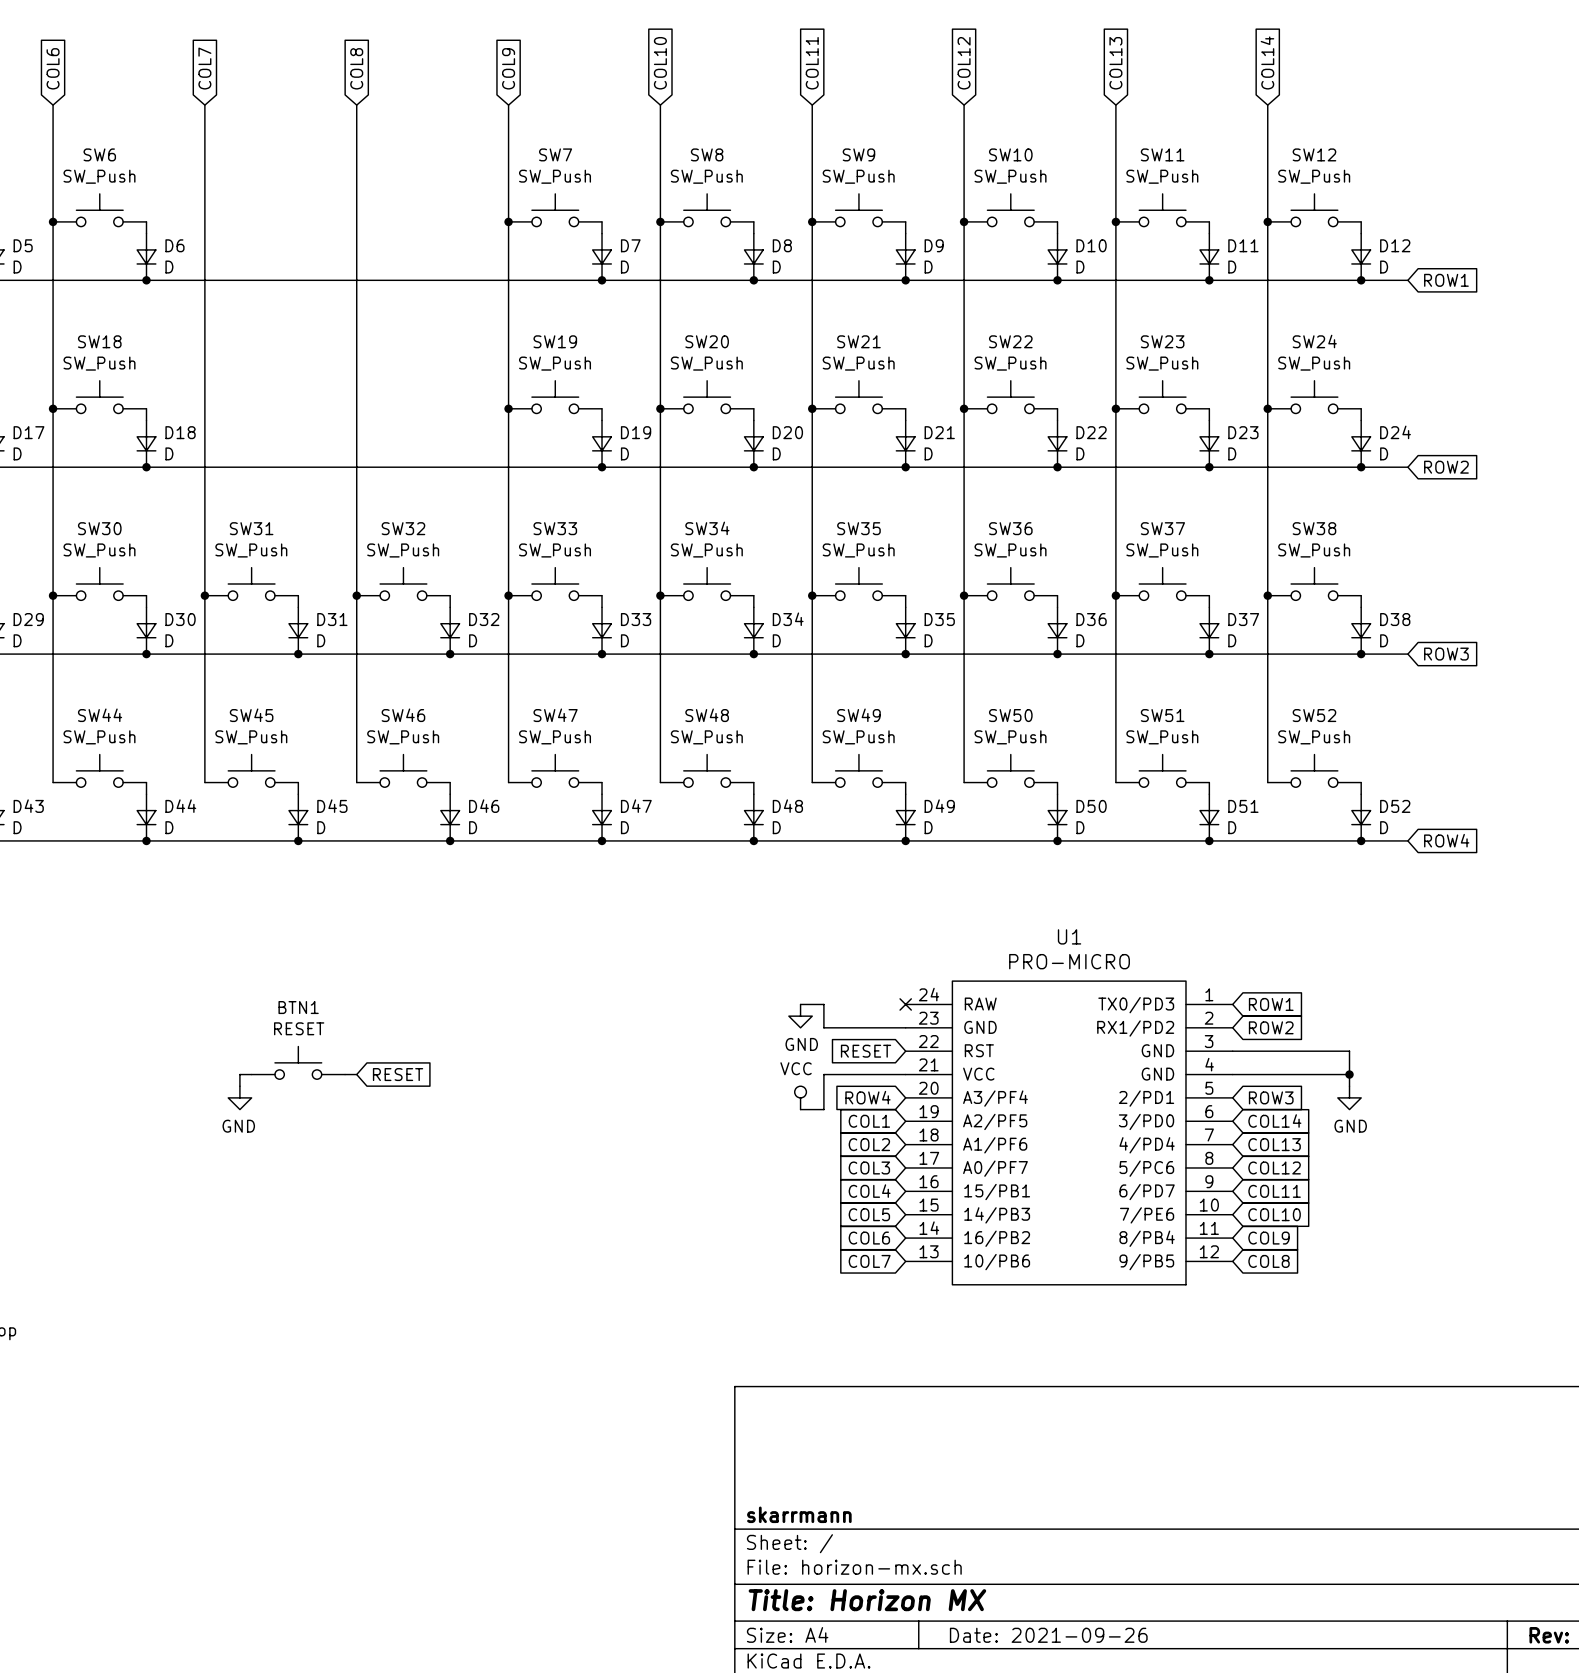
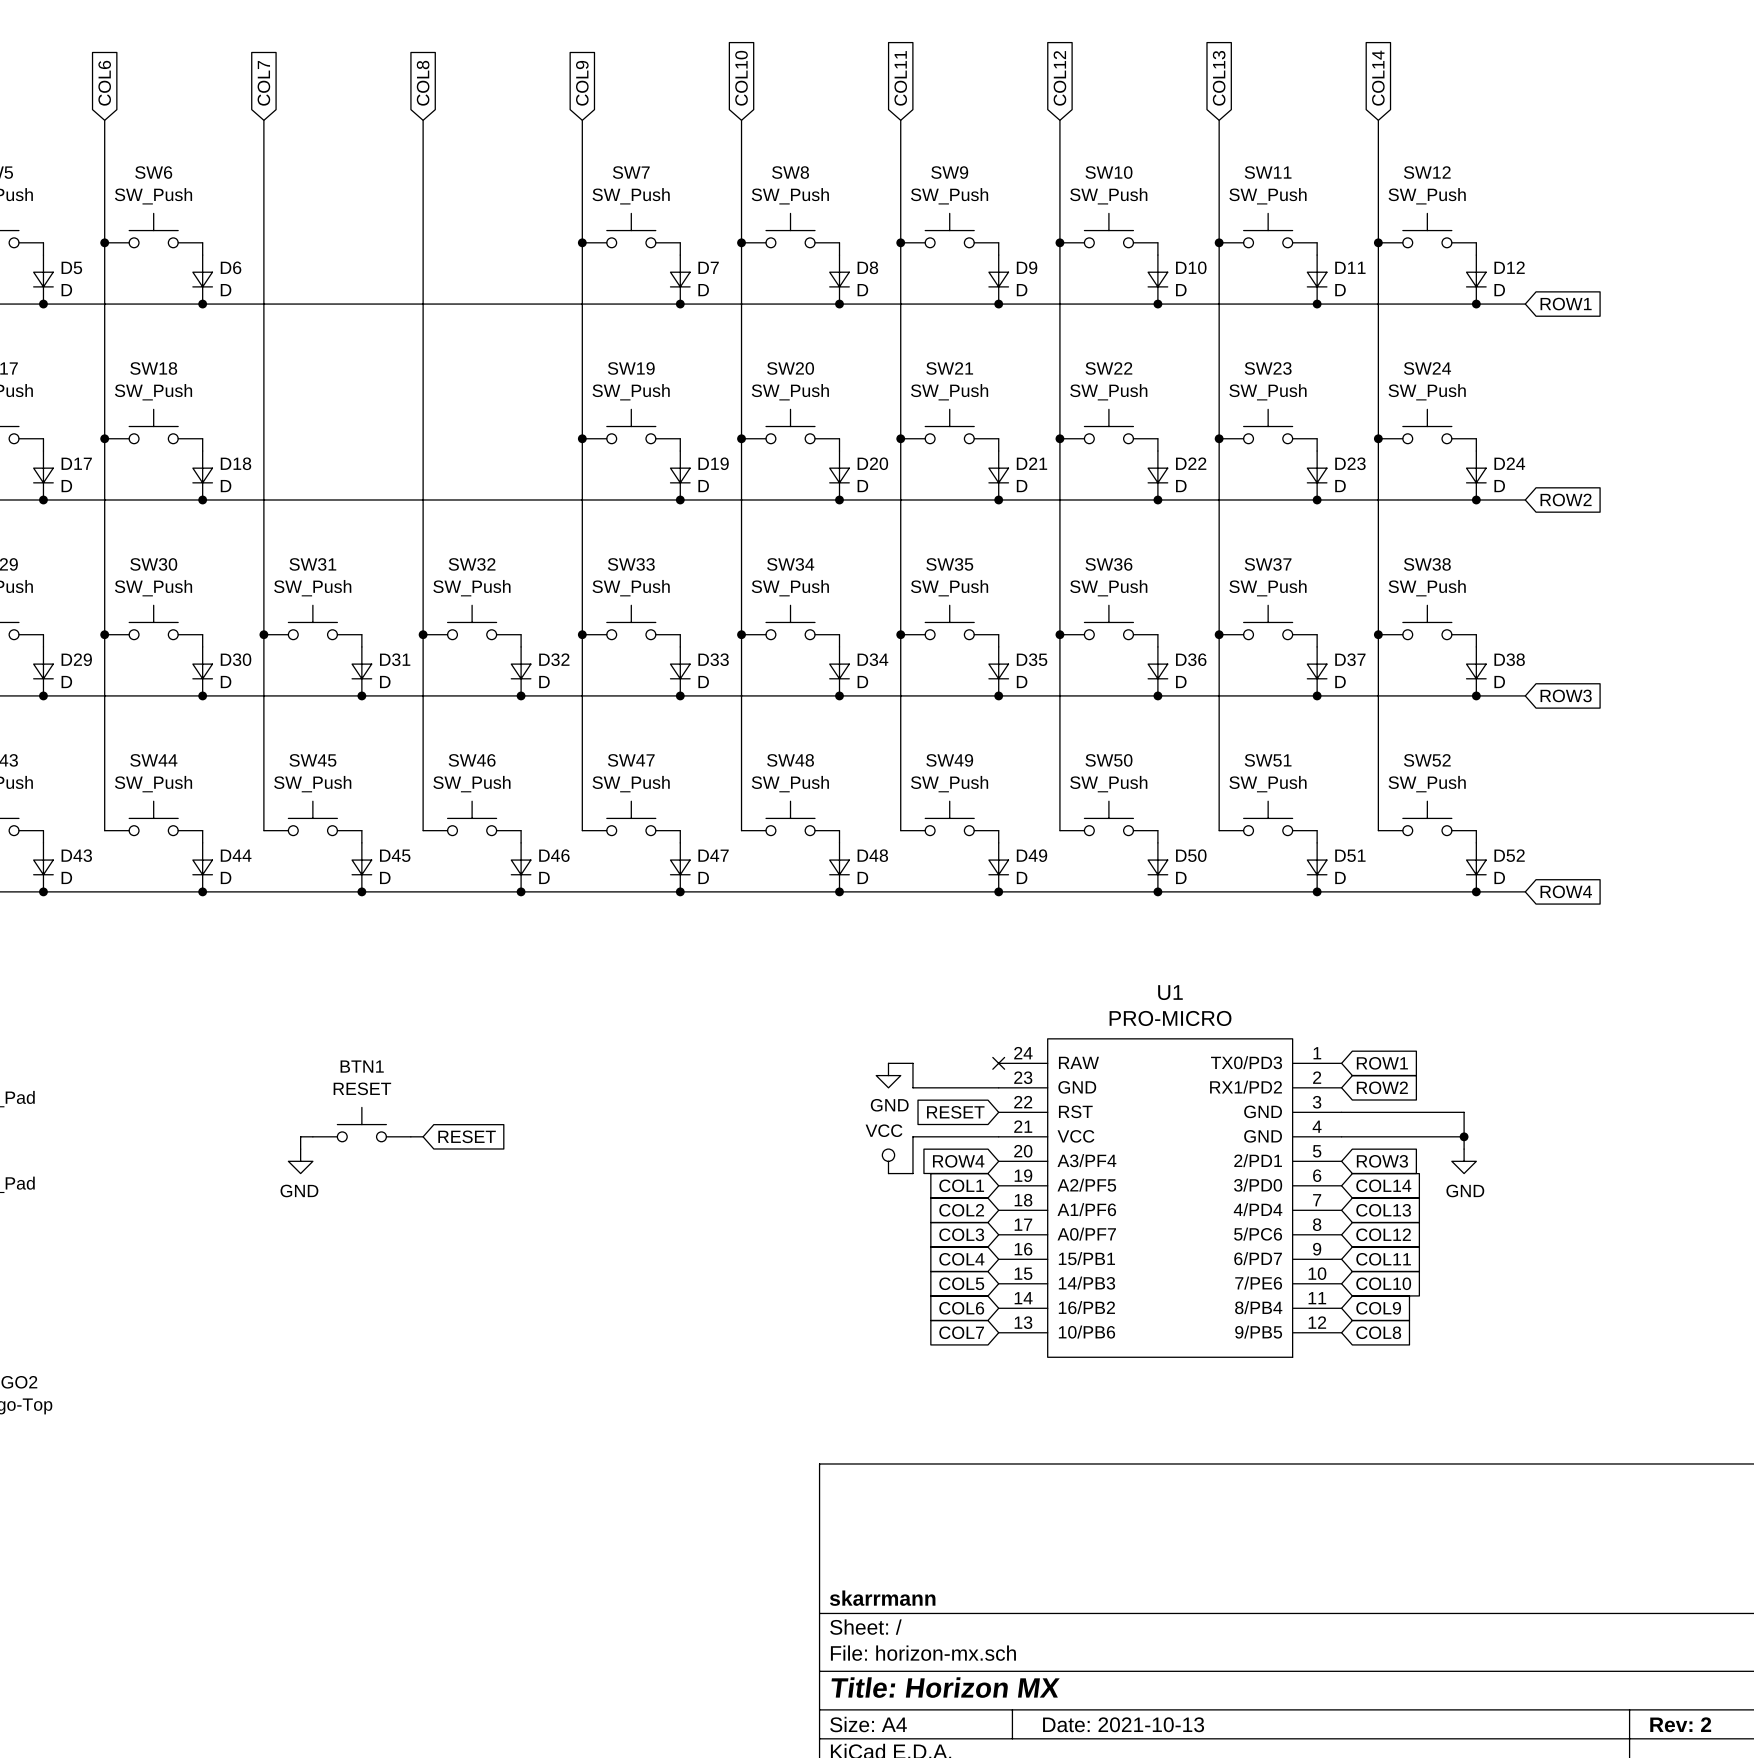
title block: Date: 2021-09-26 (1048, 1635) -> Date: 2021-10-13 (1123, 1724)

